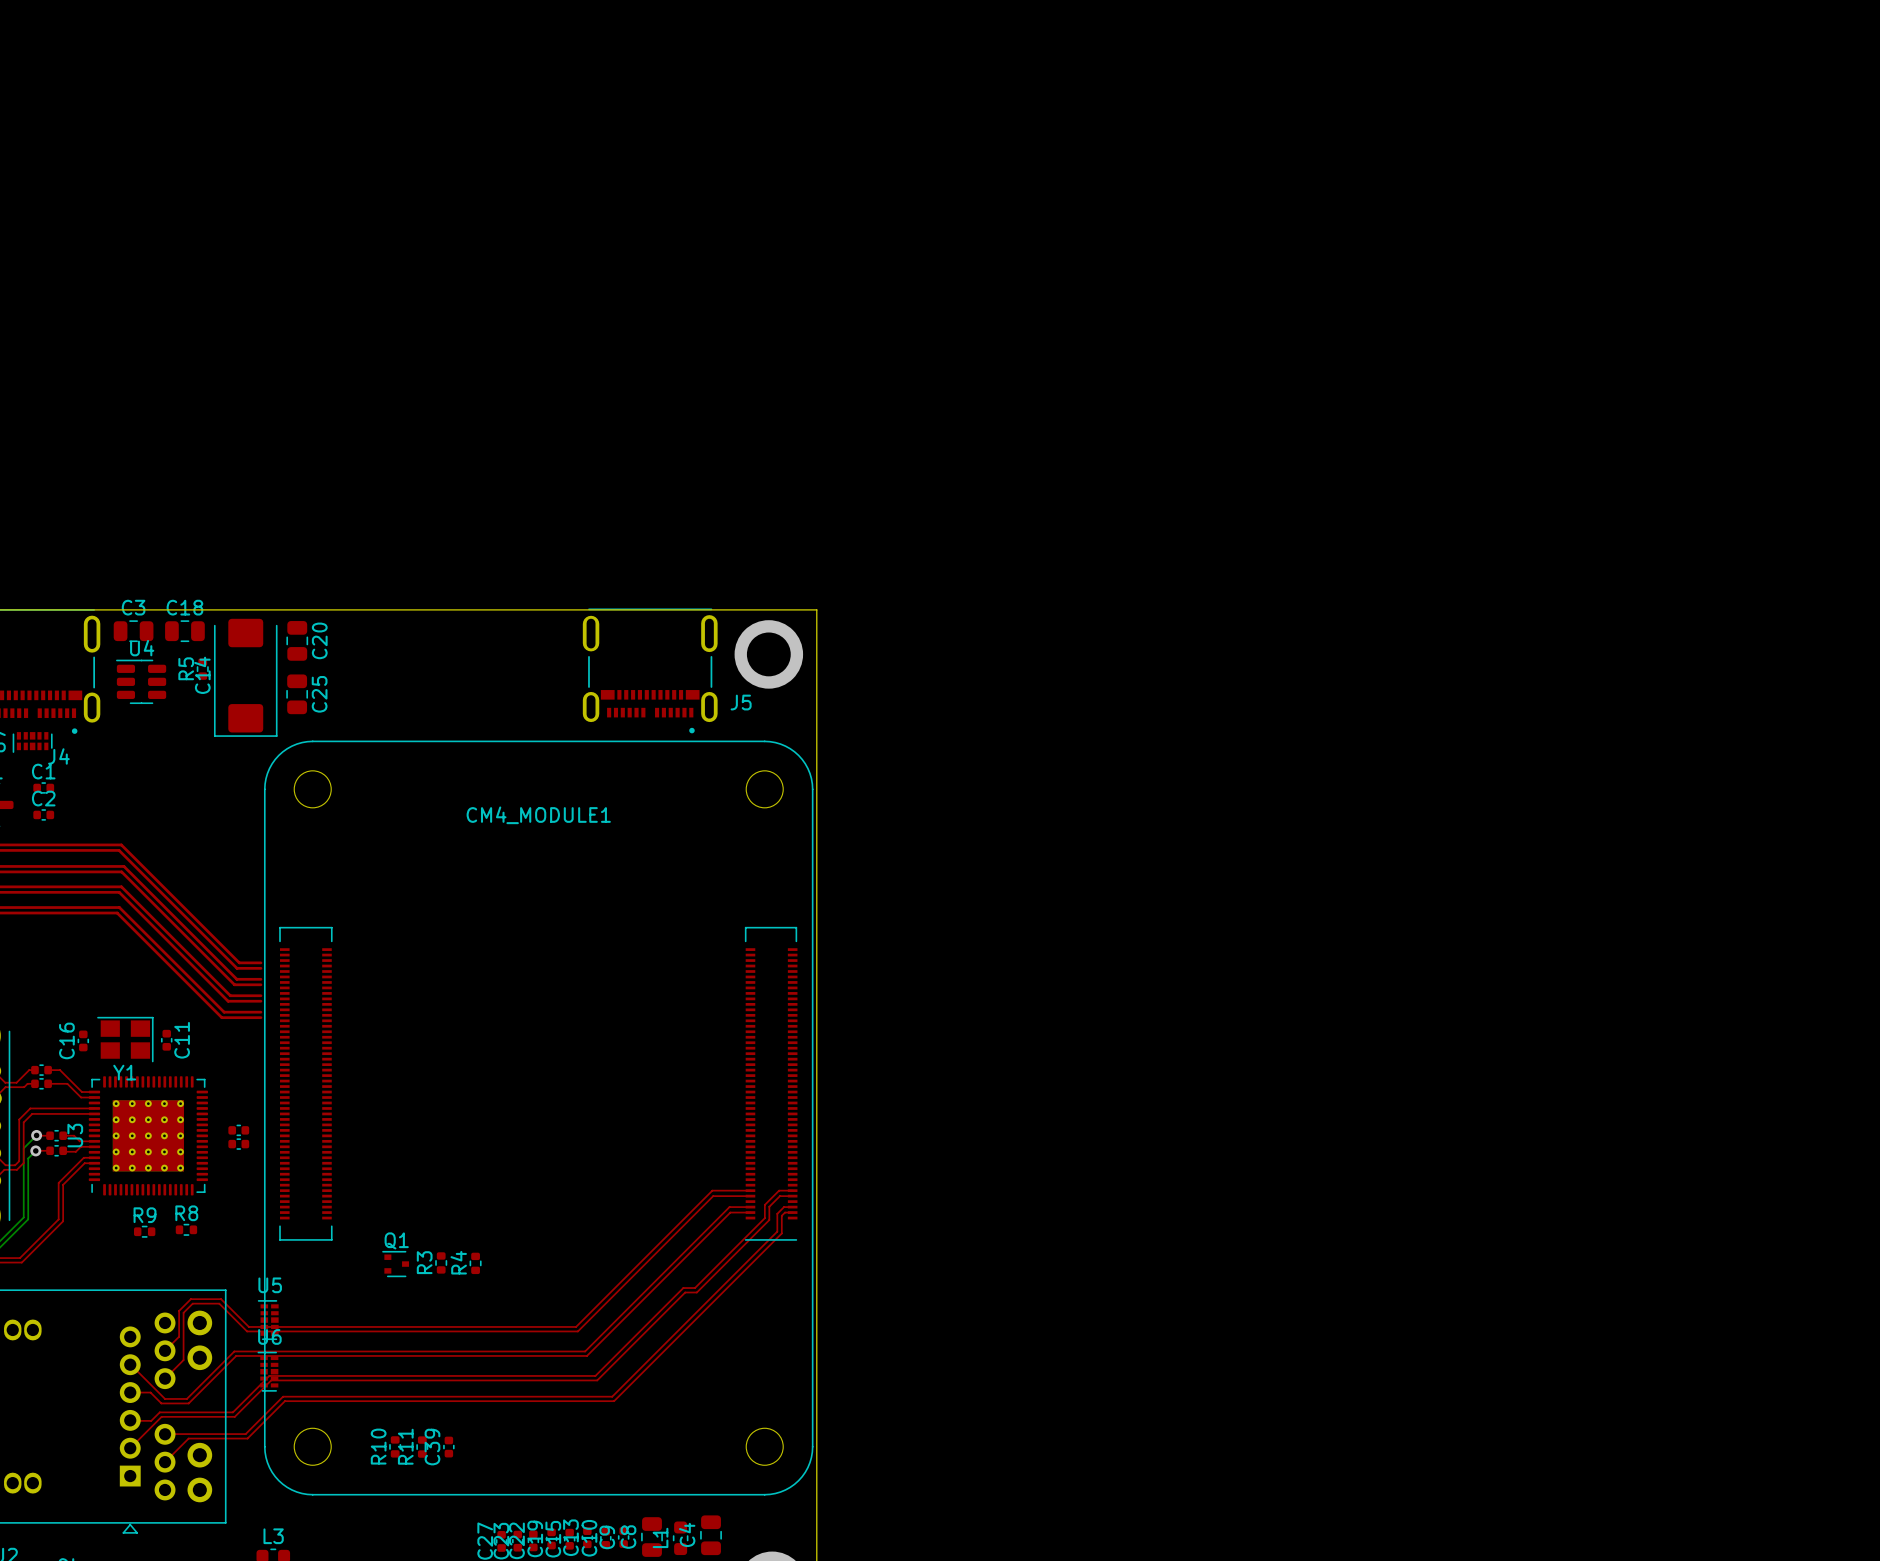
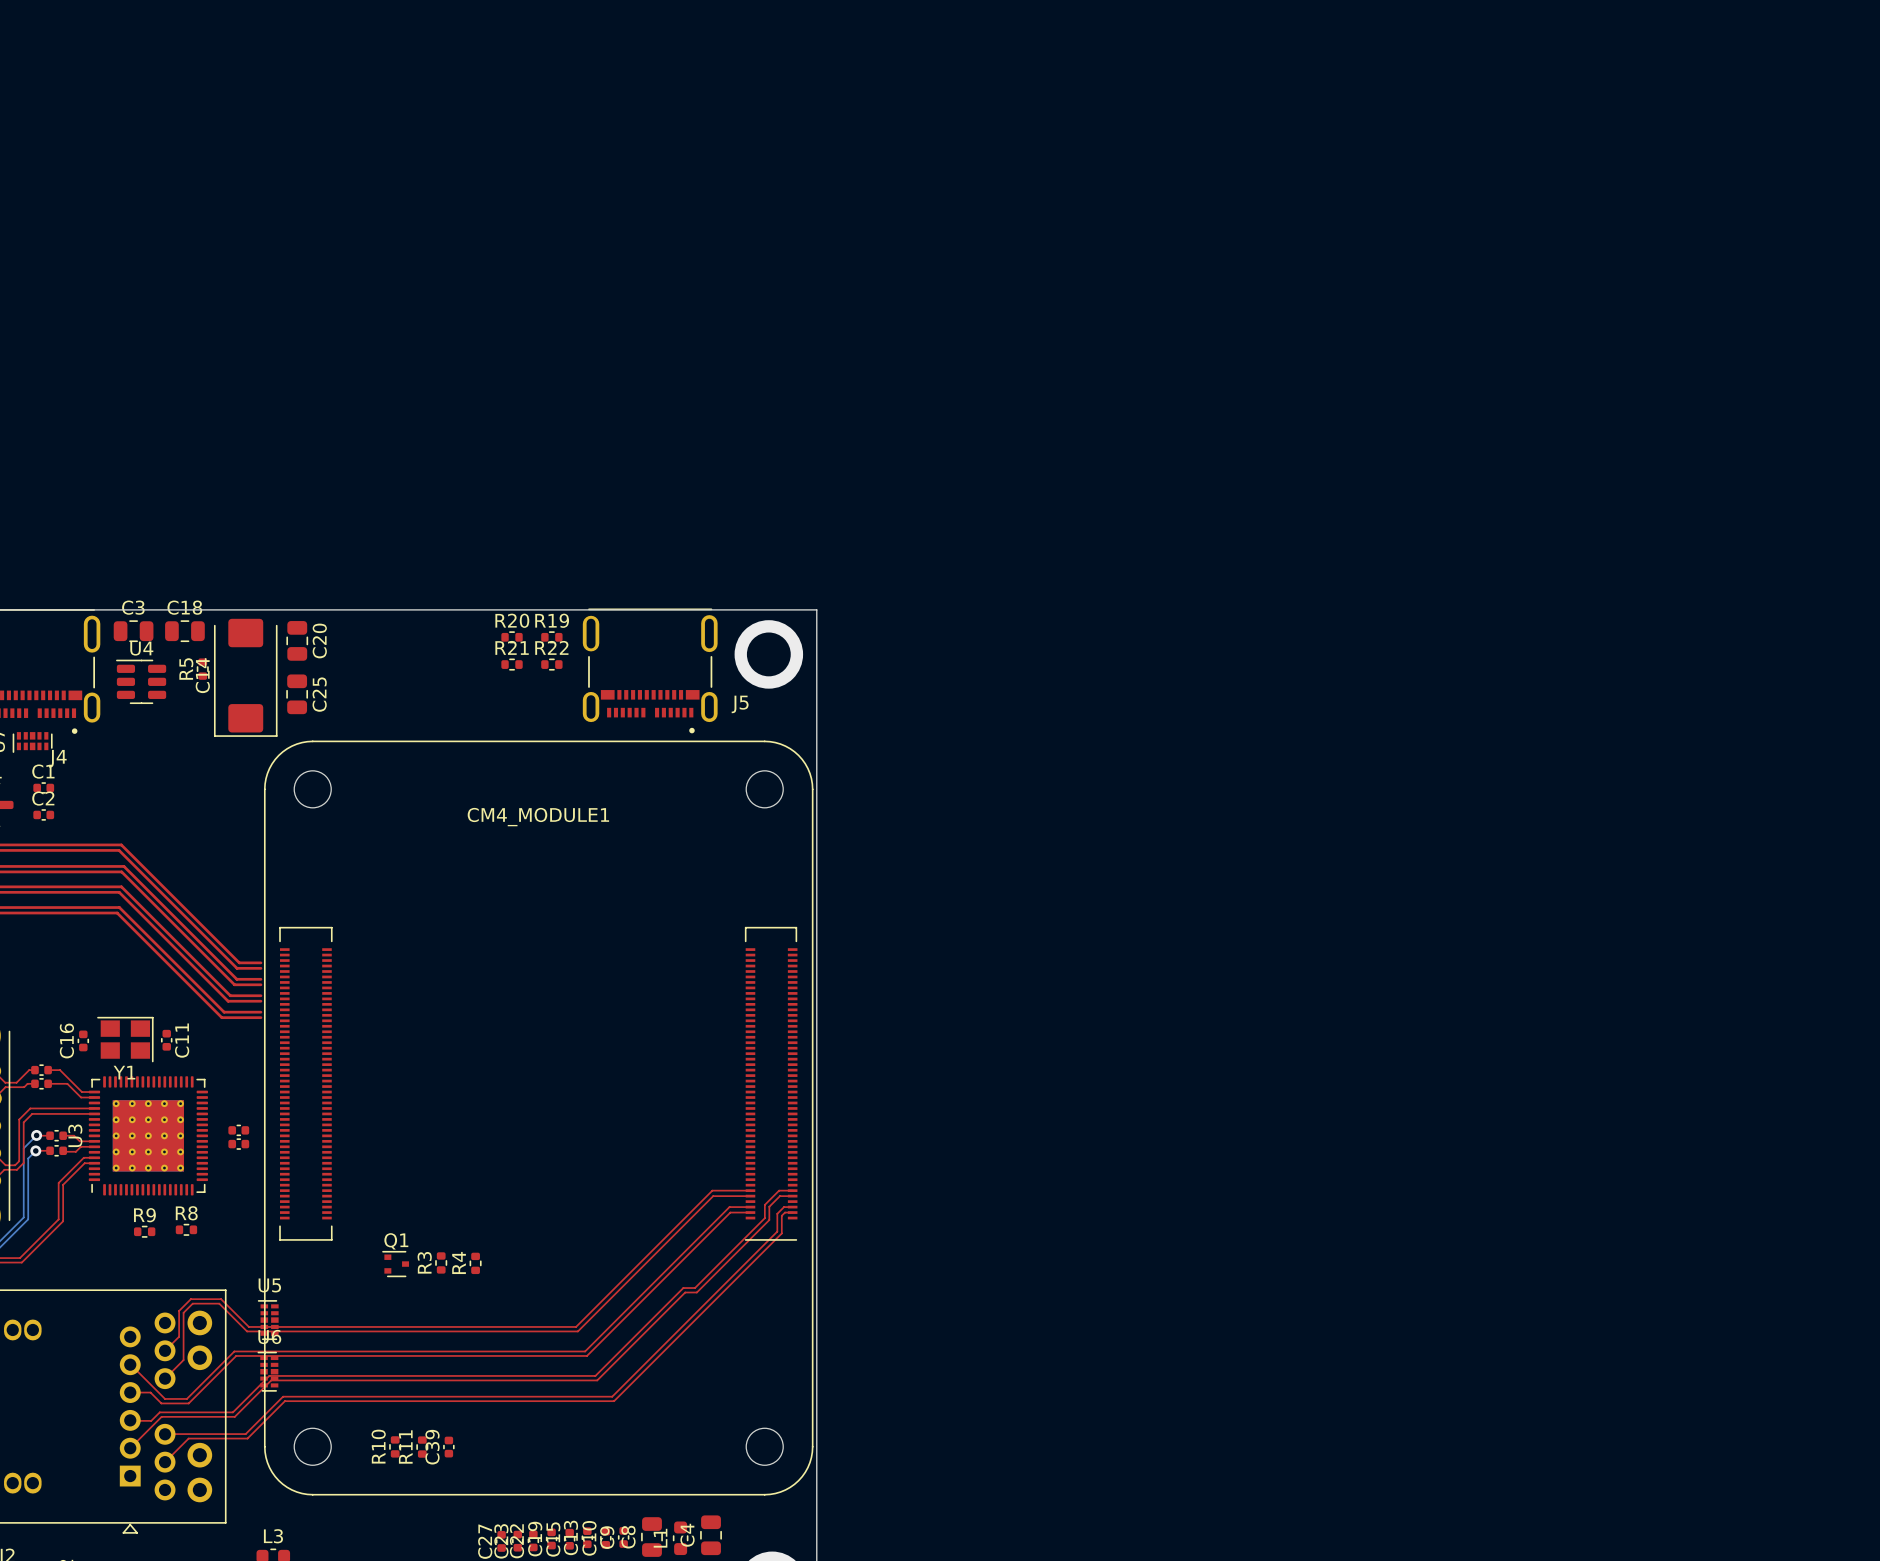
R20: none -> (512, 637)
R19: none -> (551, 637)
R21: none -> (512, 664)
R22: none -> (551, 664)

